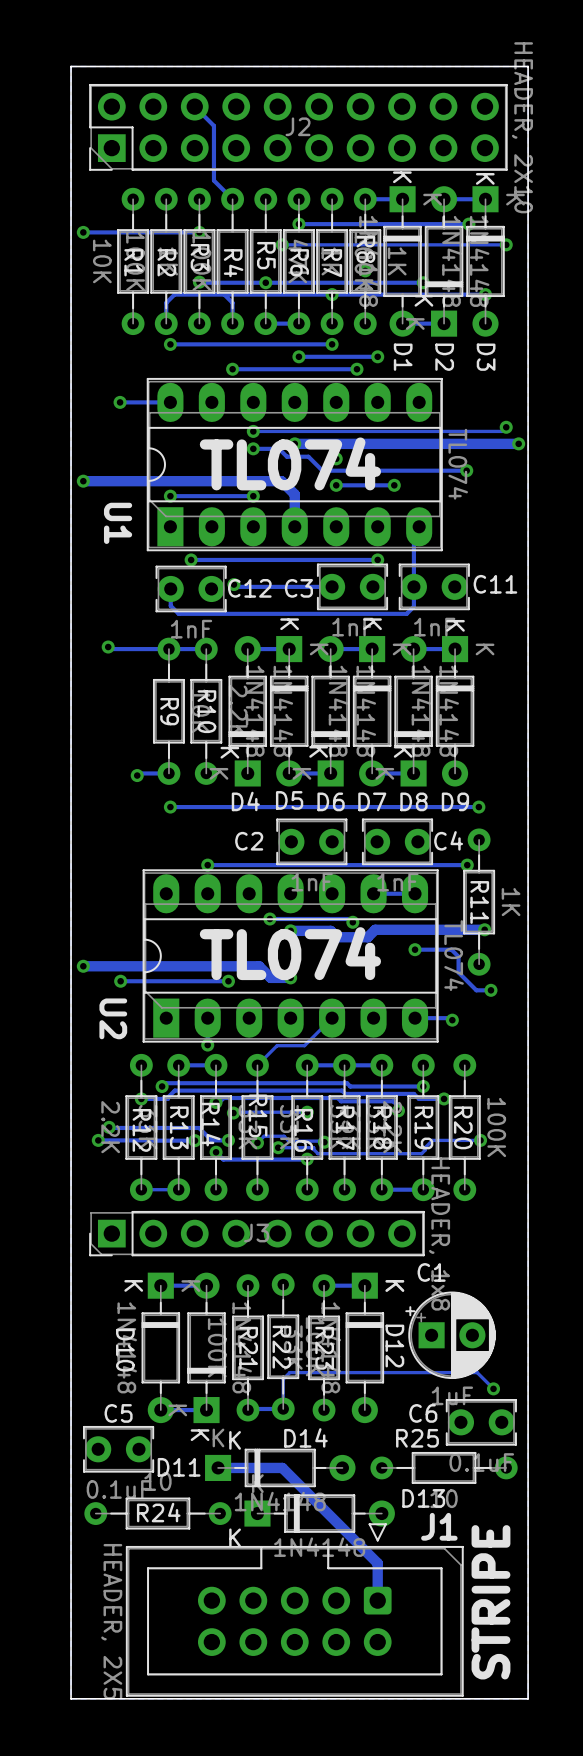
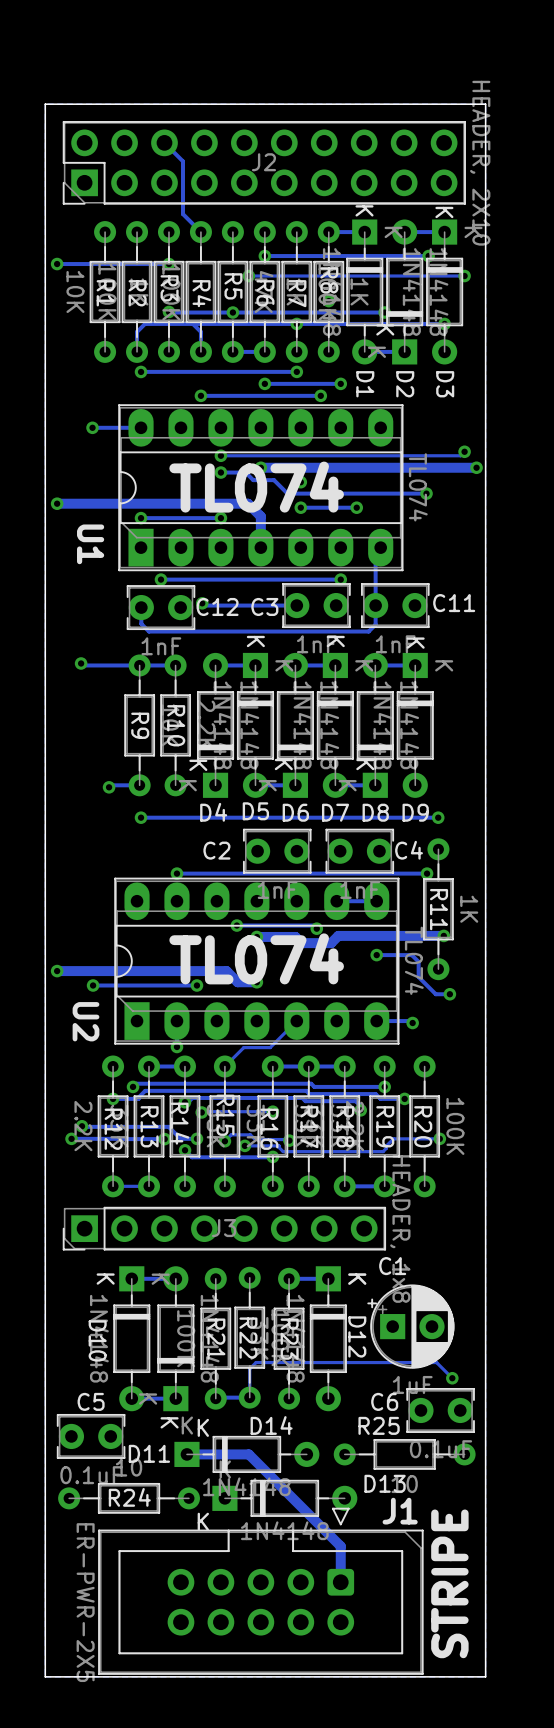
J1 value: HEADER, 2X5 (111, 1621) -> ER-PWR-2X5 (85, 1602)

